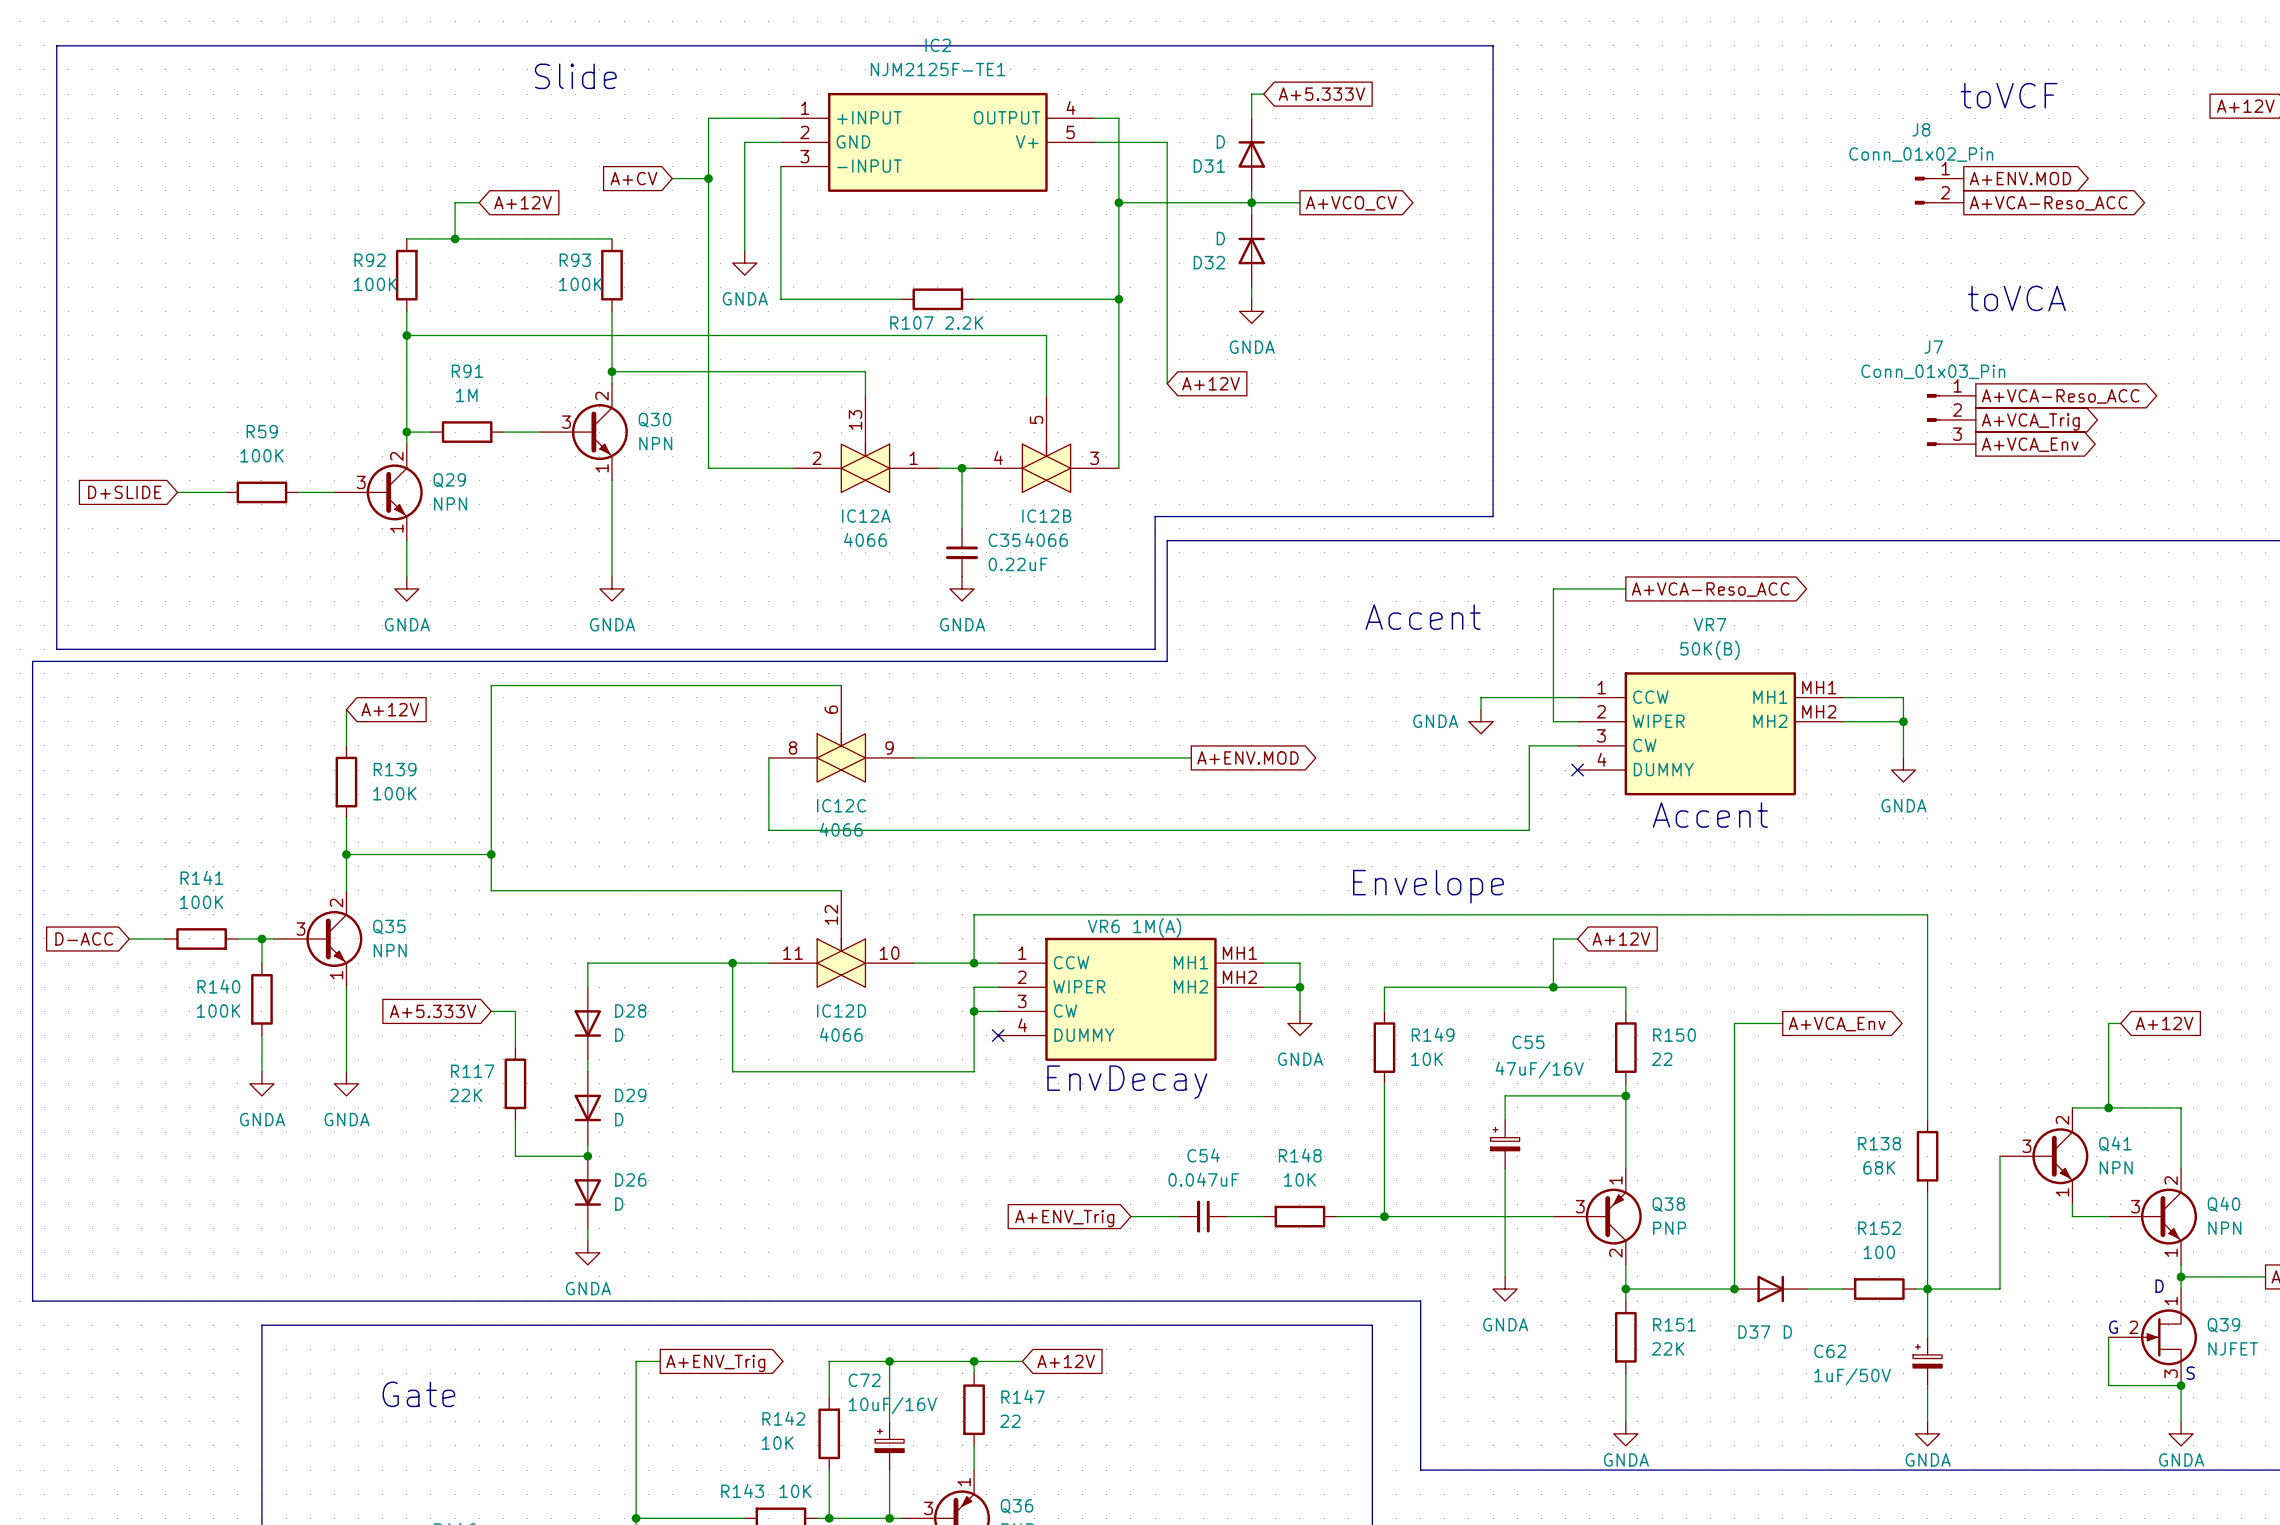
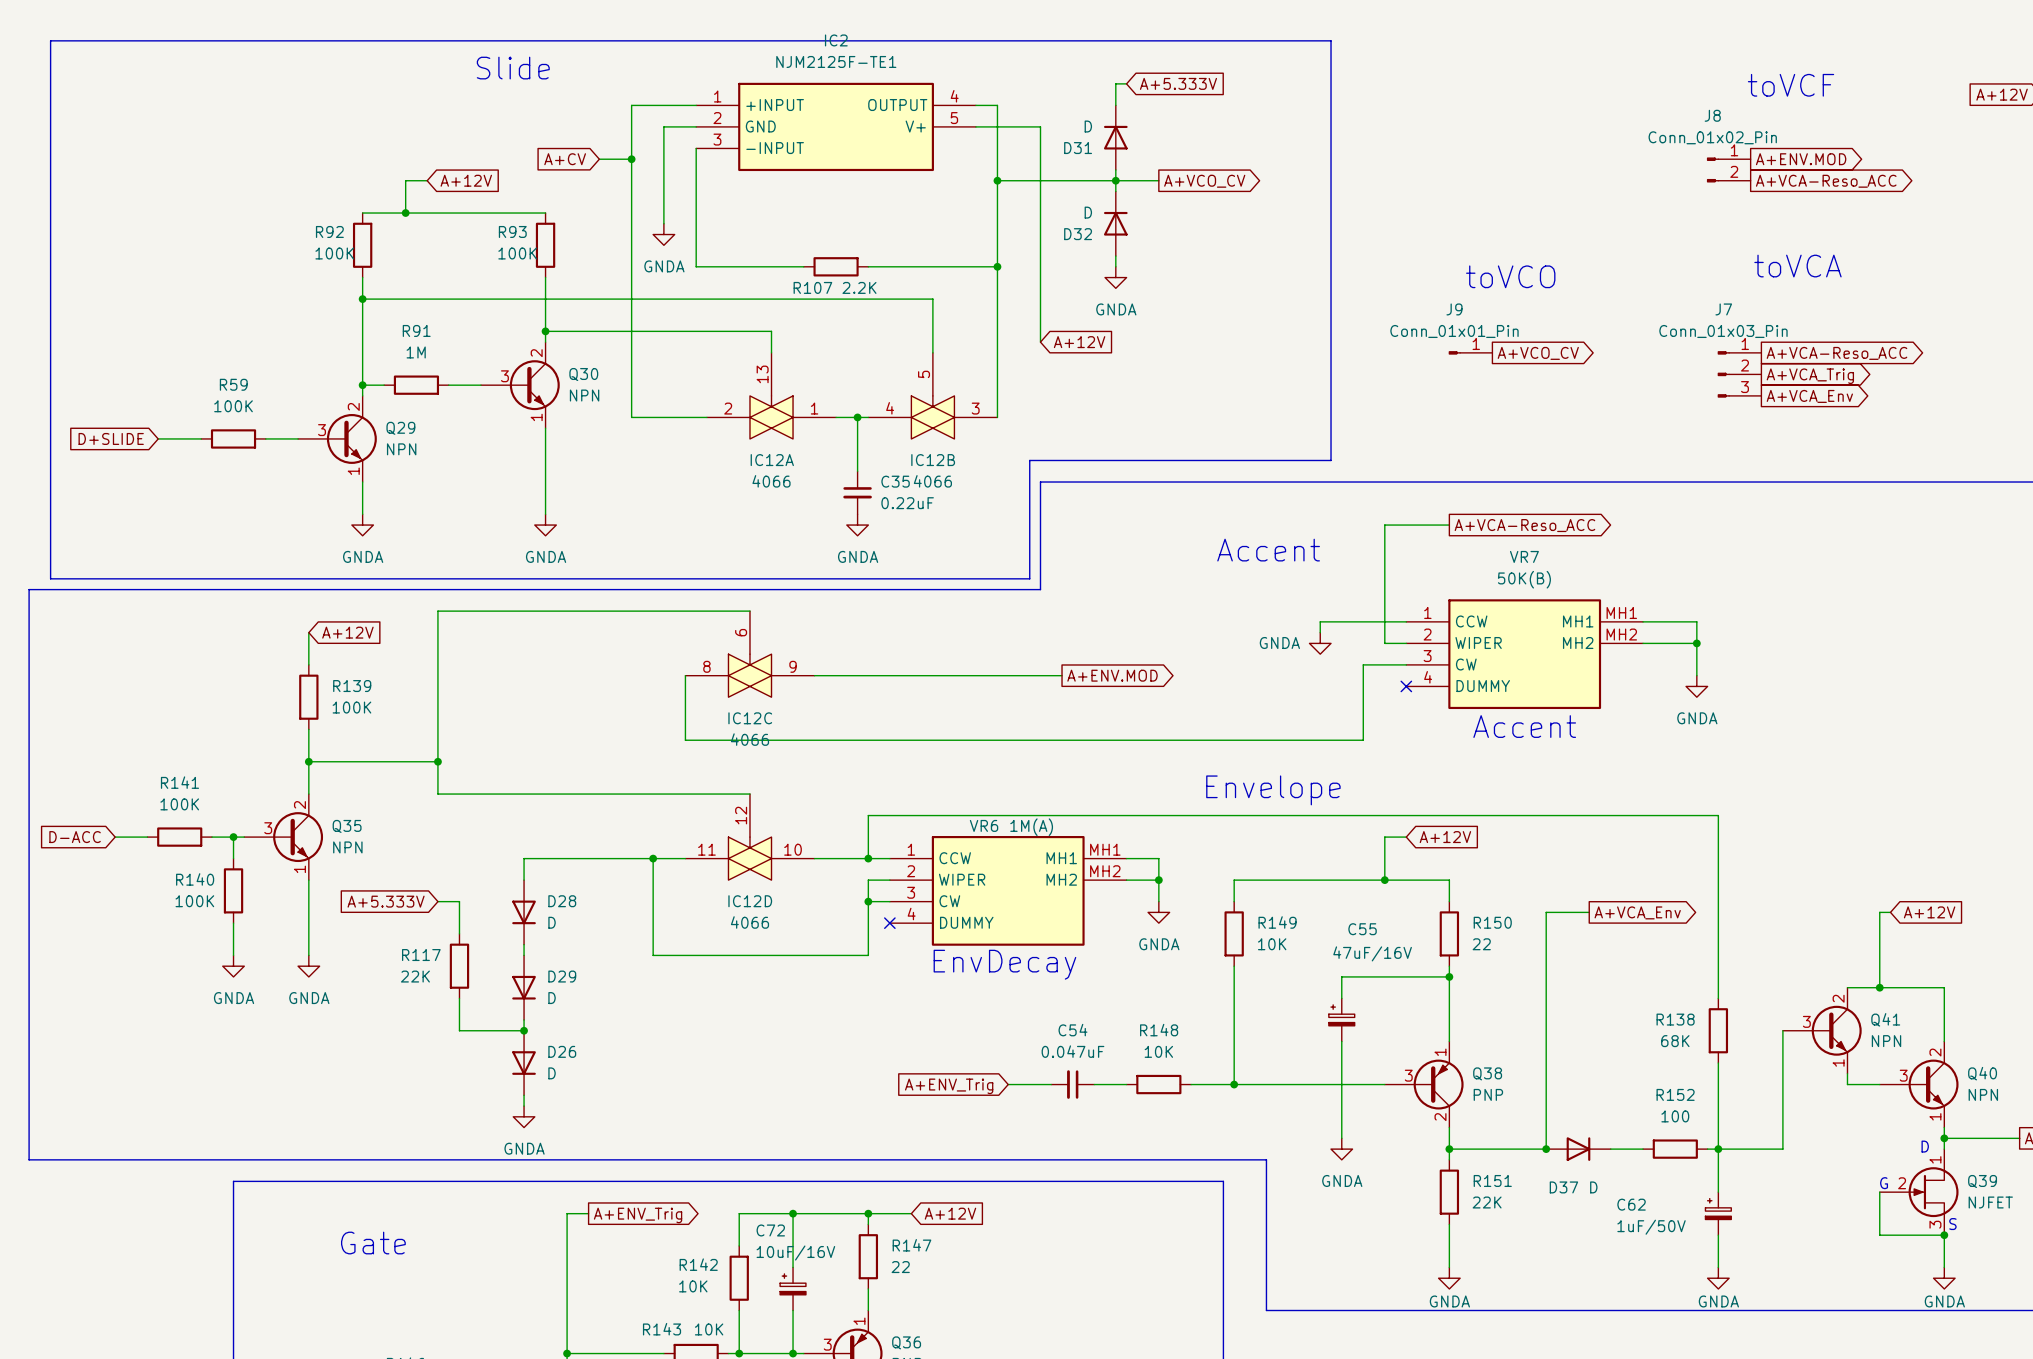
text: none -> toVCO (1510, 276)
J9: none -> Conn_01x01_Pin (1470, 352)
global label: none -> A+VCO_CV (1538, 353)

